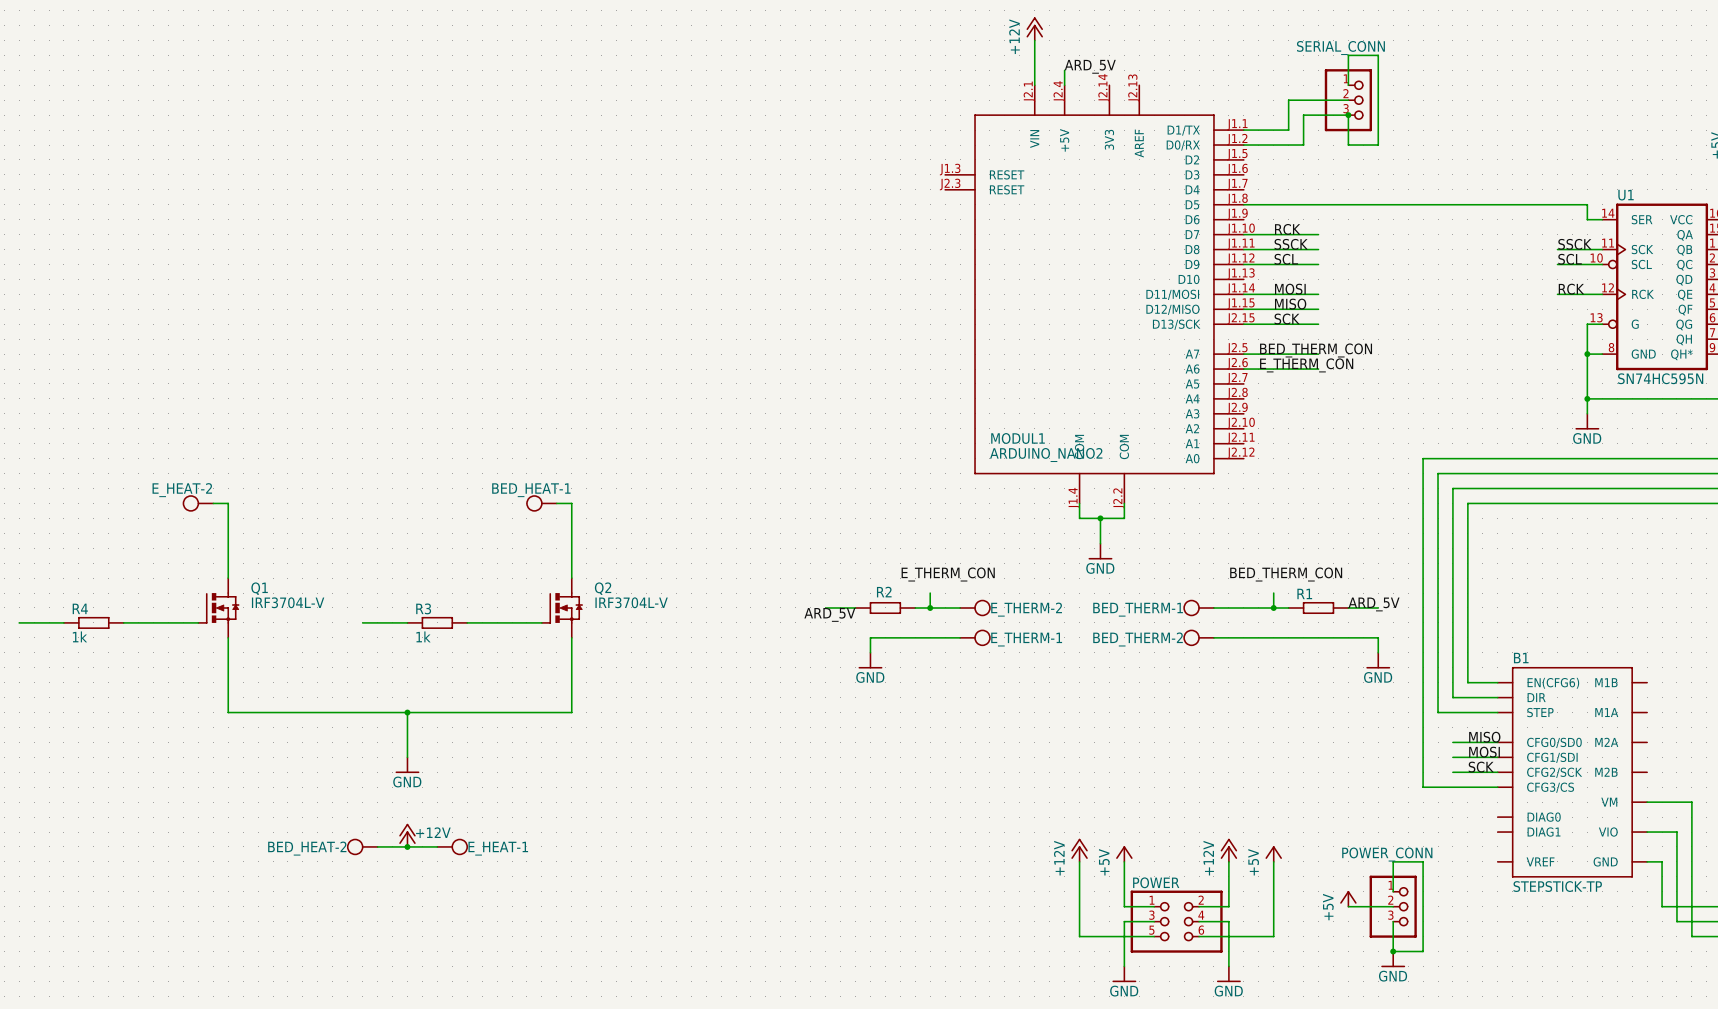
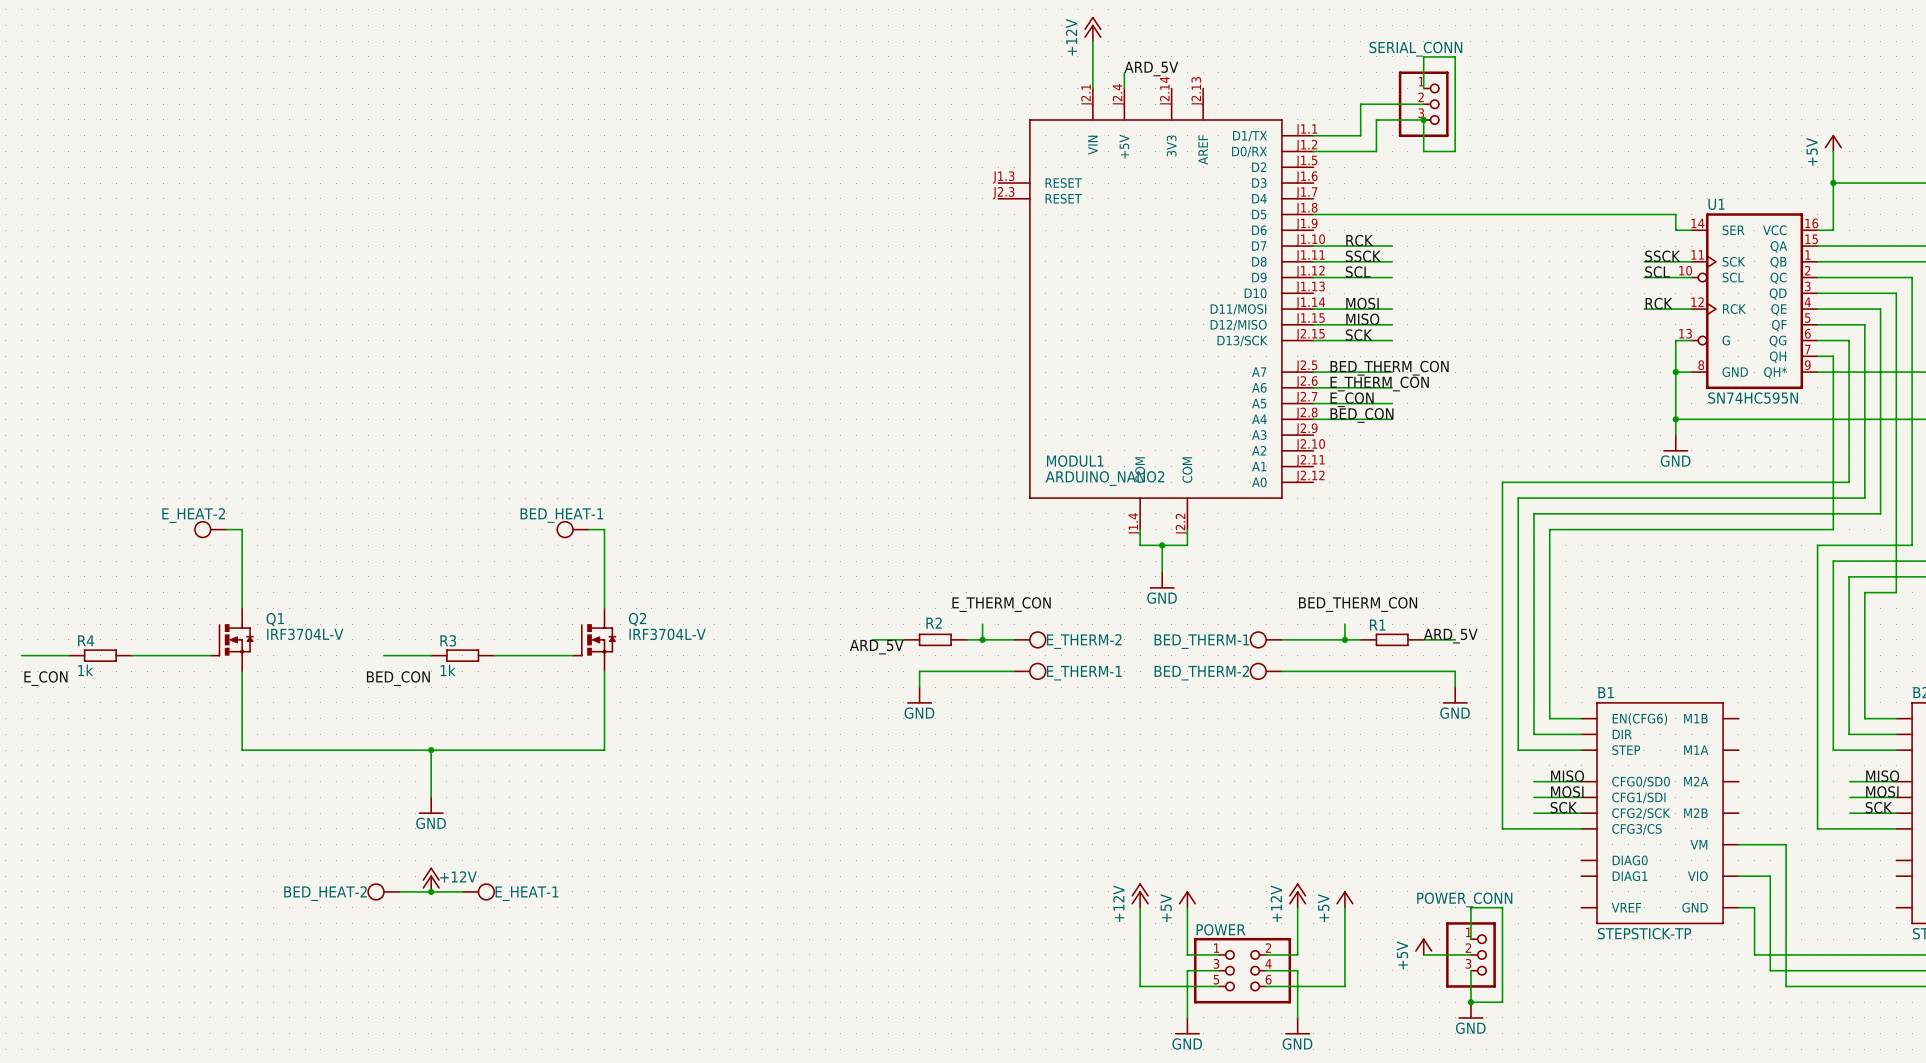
label: none -> E_CON (1352, 399)
wire: none -> (1313, 403) (1392, 403)
label: none -> BED_CON (1362, 415)
wire: none -> (1313, 419) (1392, 419)
label: none -> E_CON (45, 678)
label: none -> BED_CON (398, 678)

